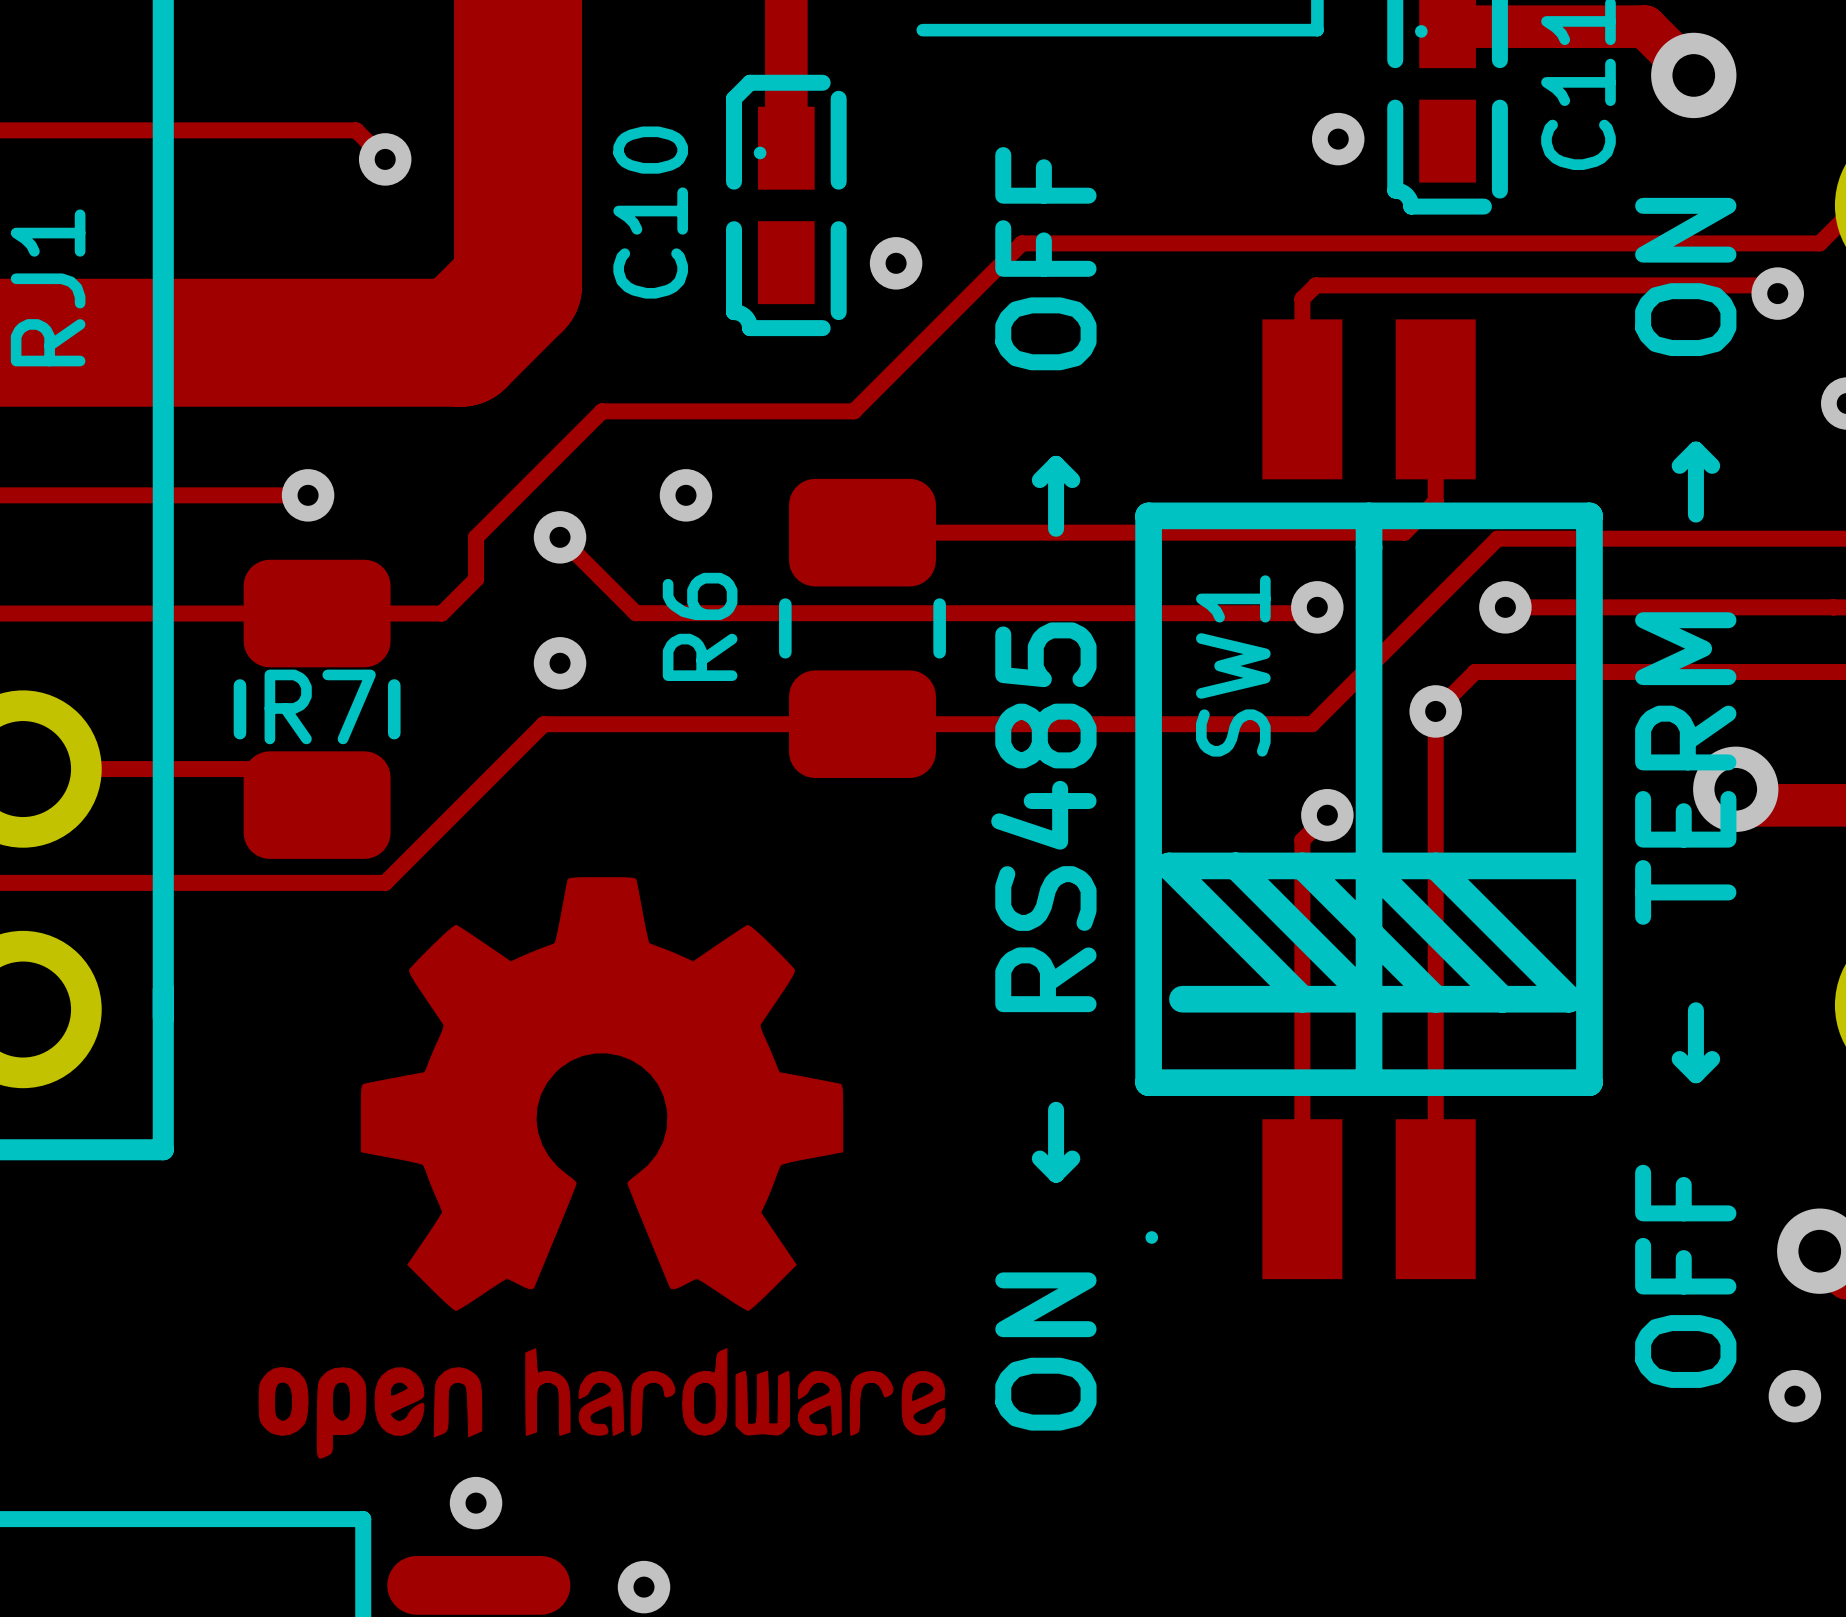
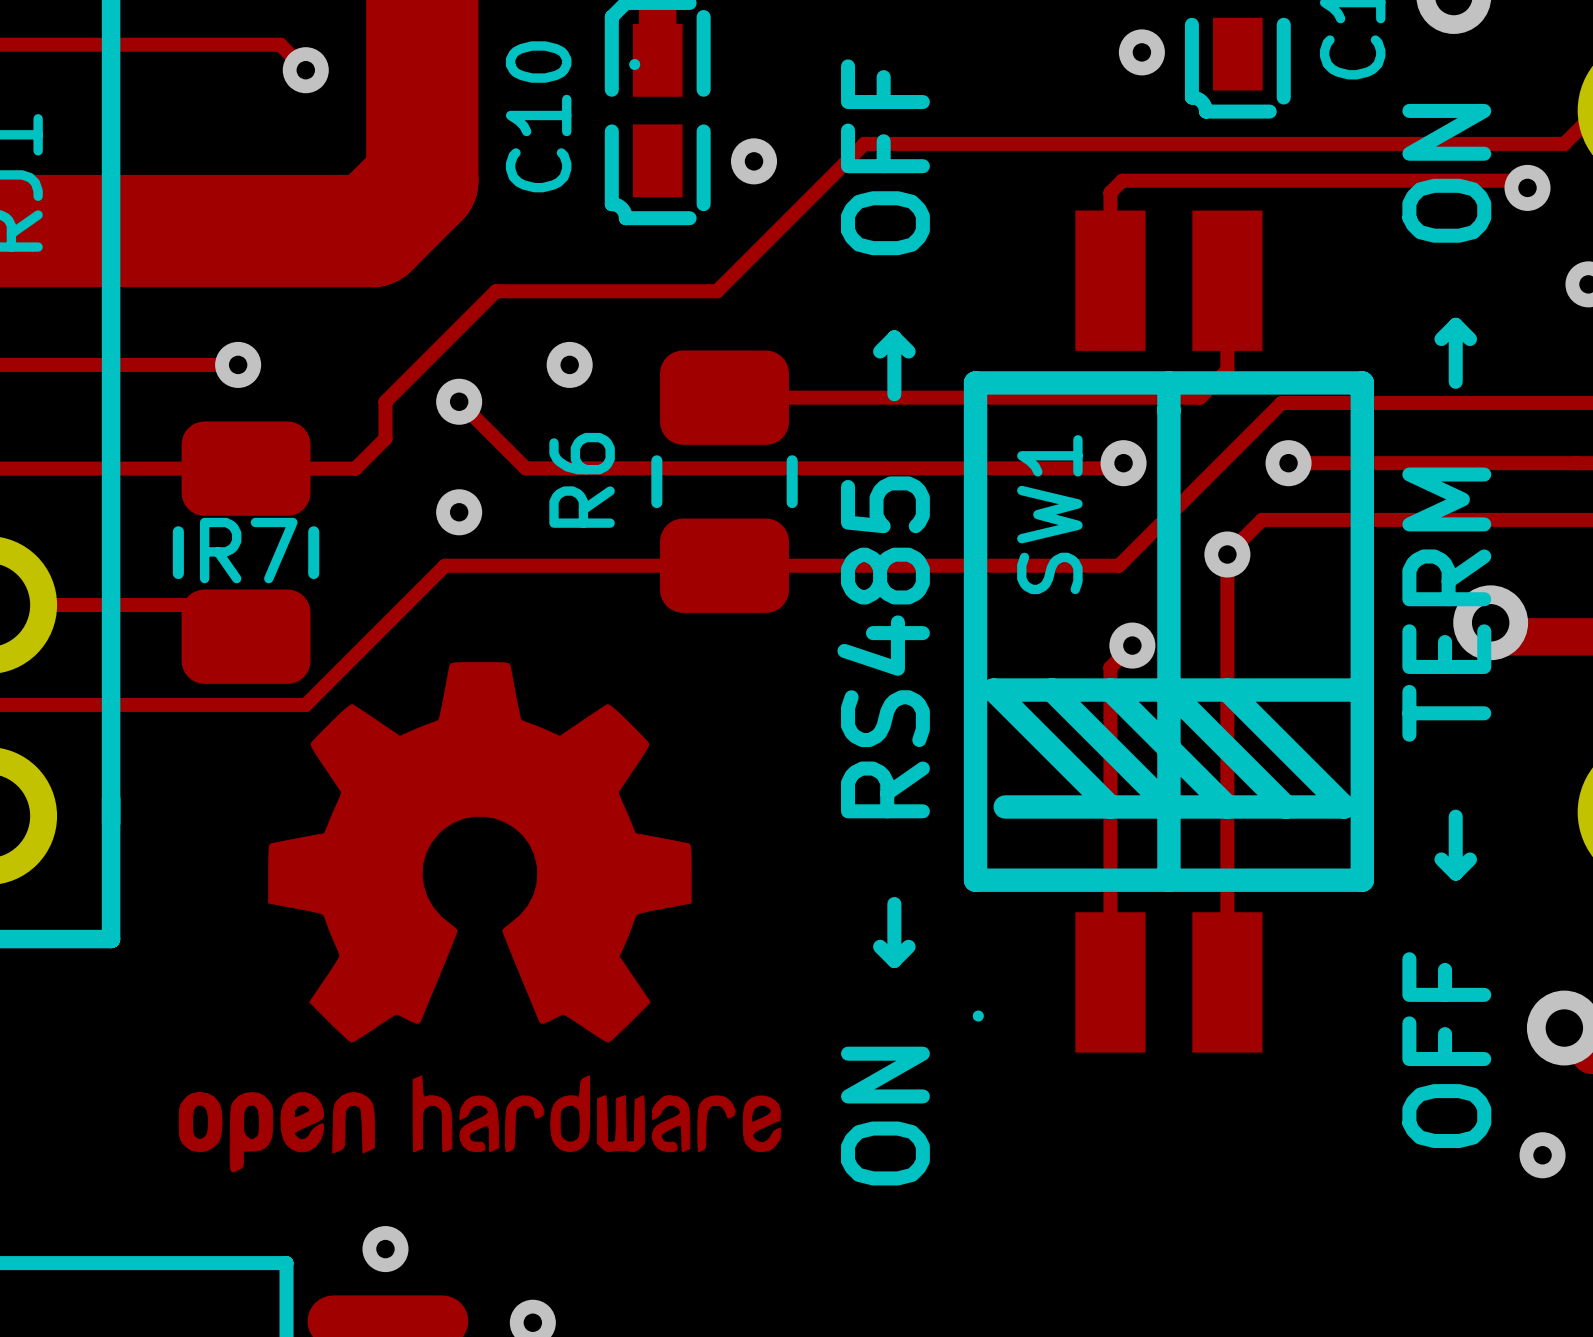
drawing position: (602, 1167) -> (479, 917)

